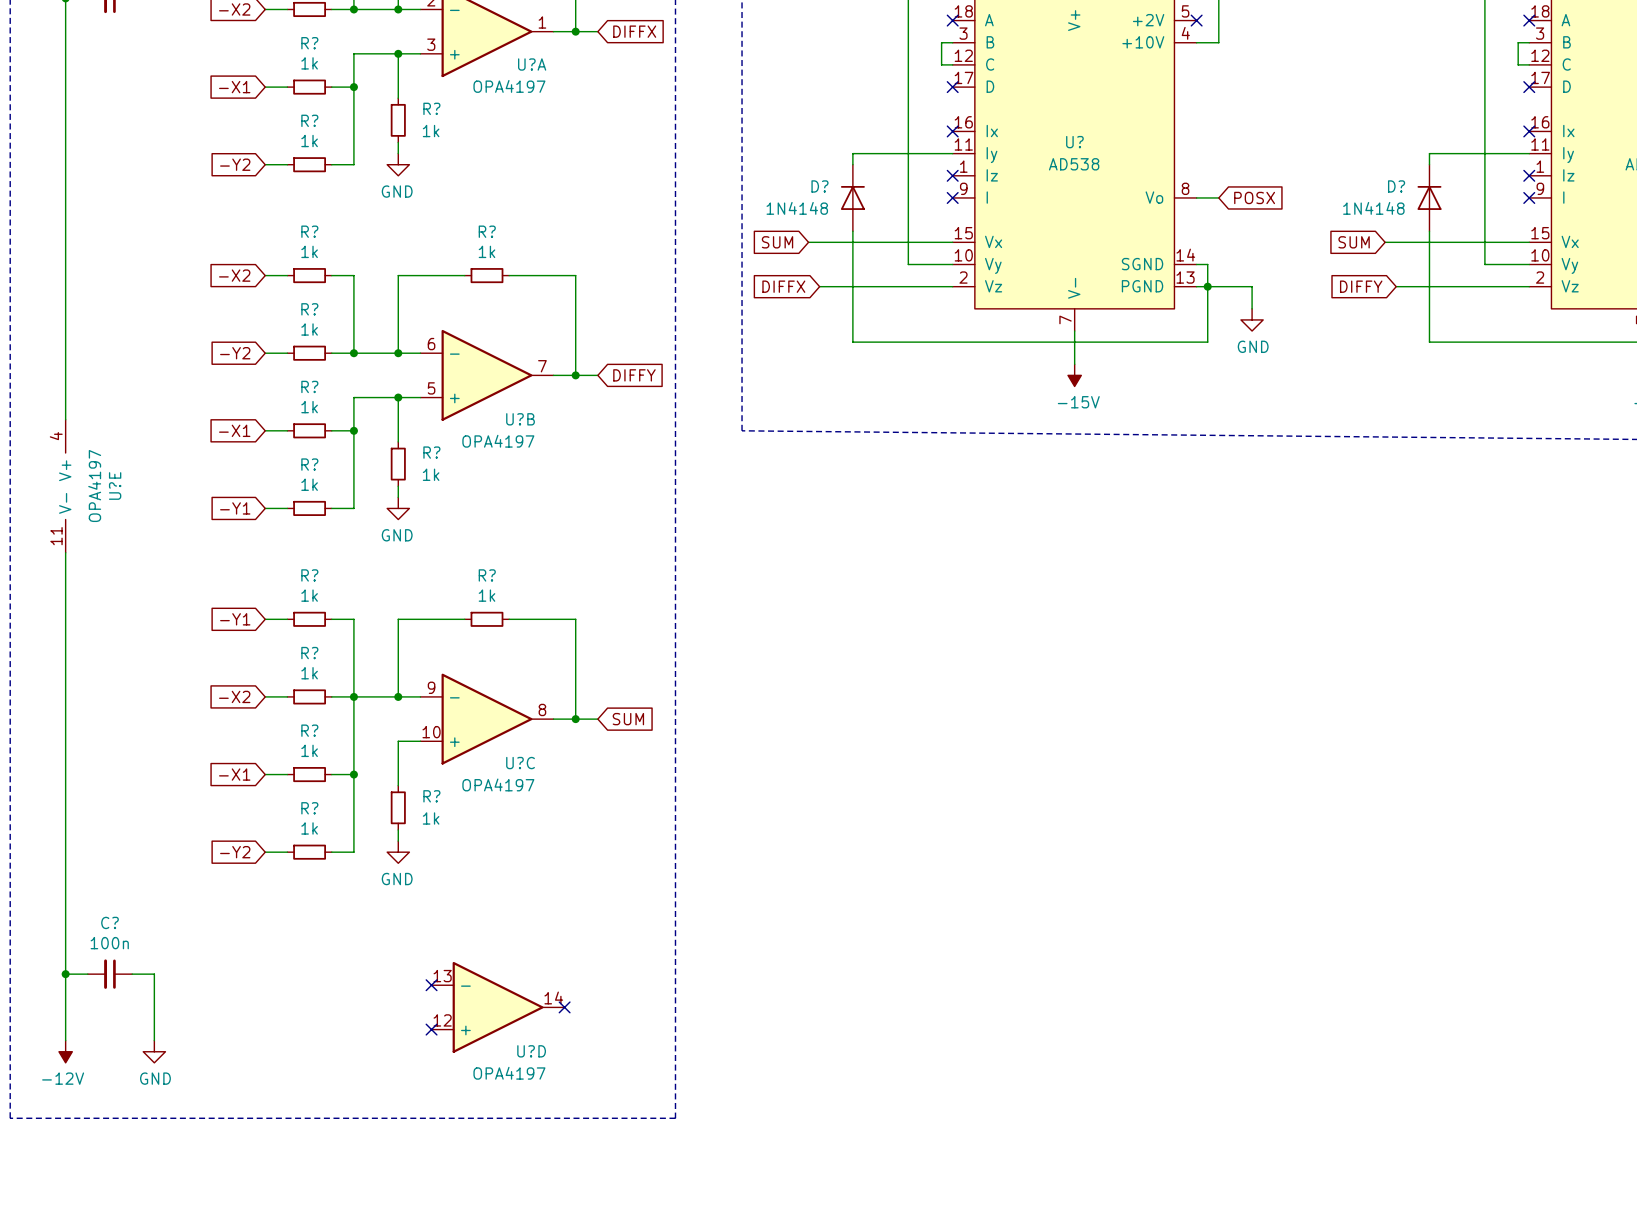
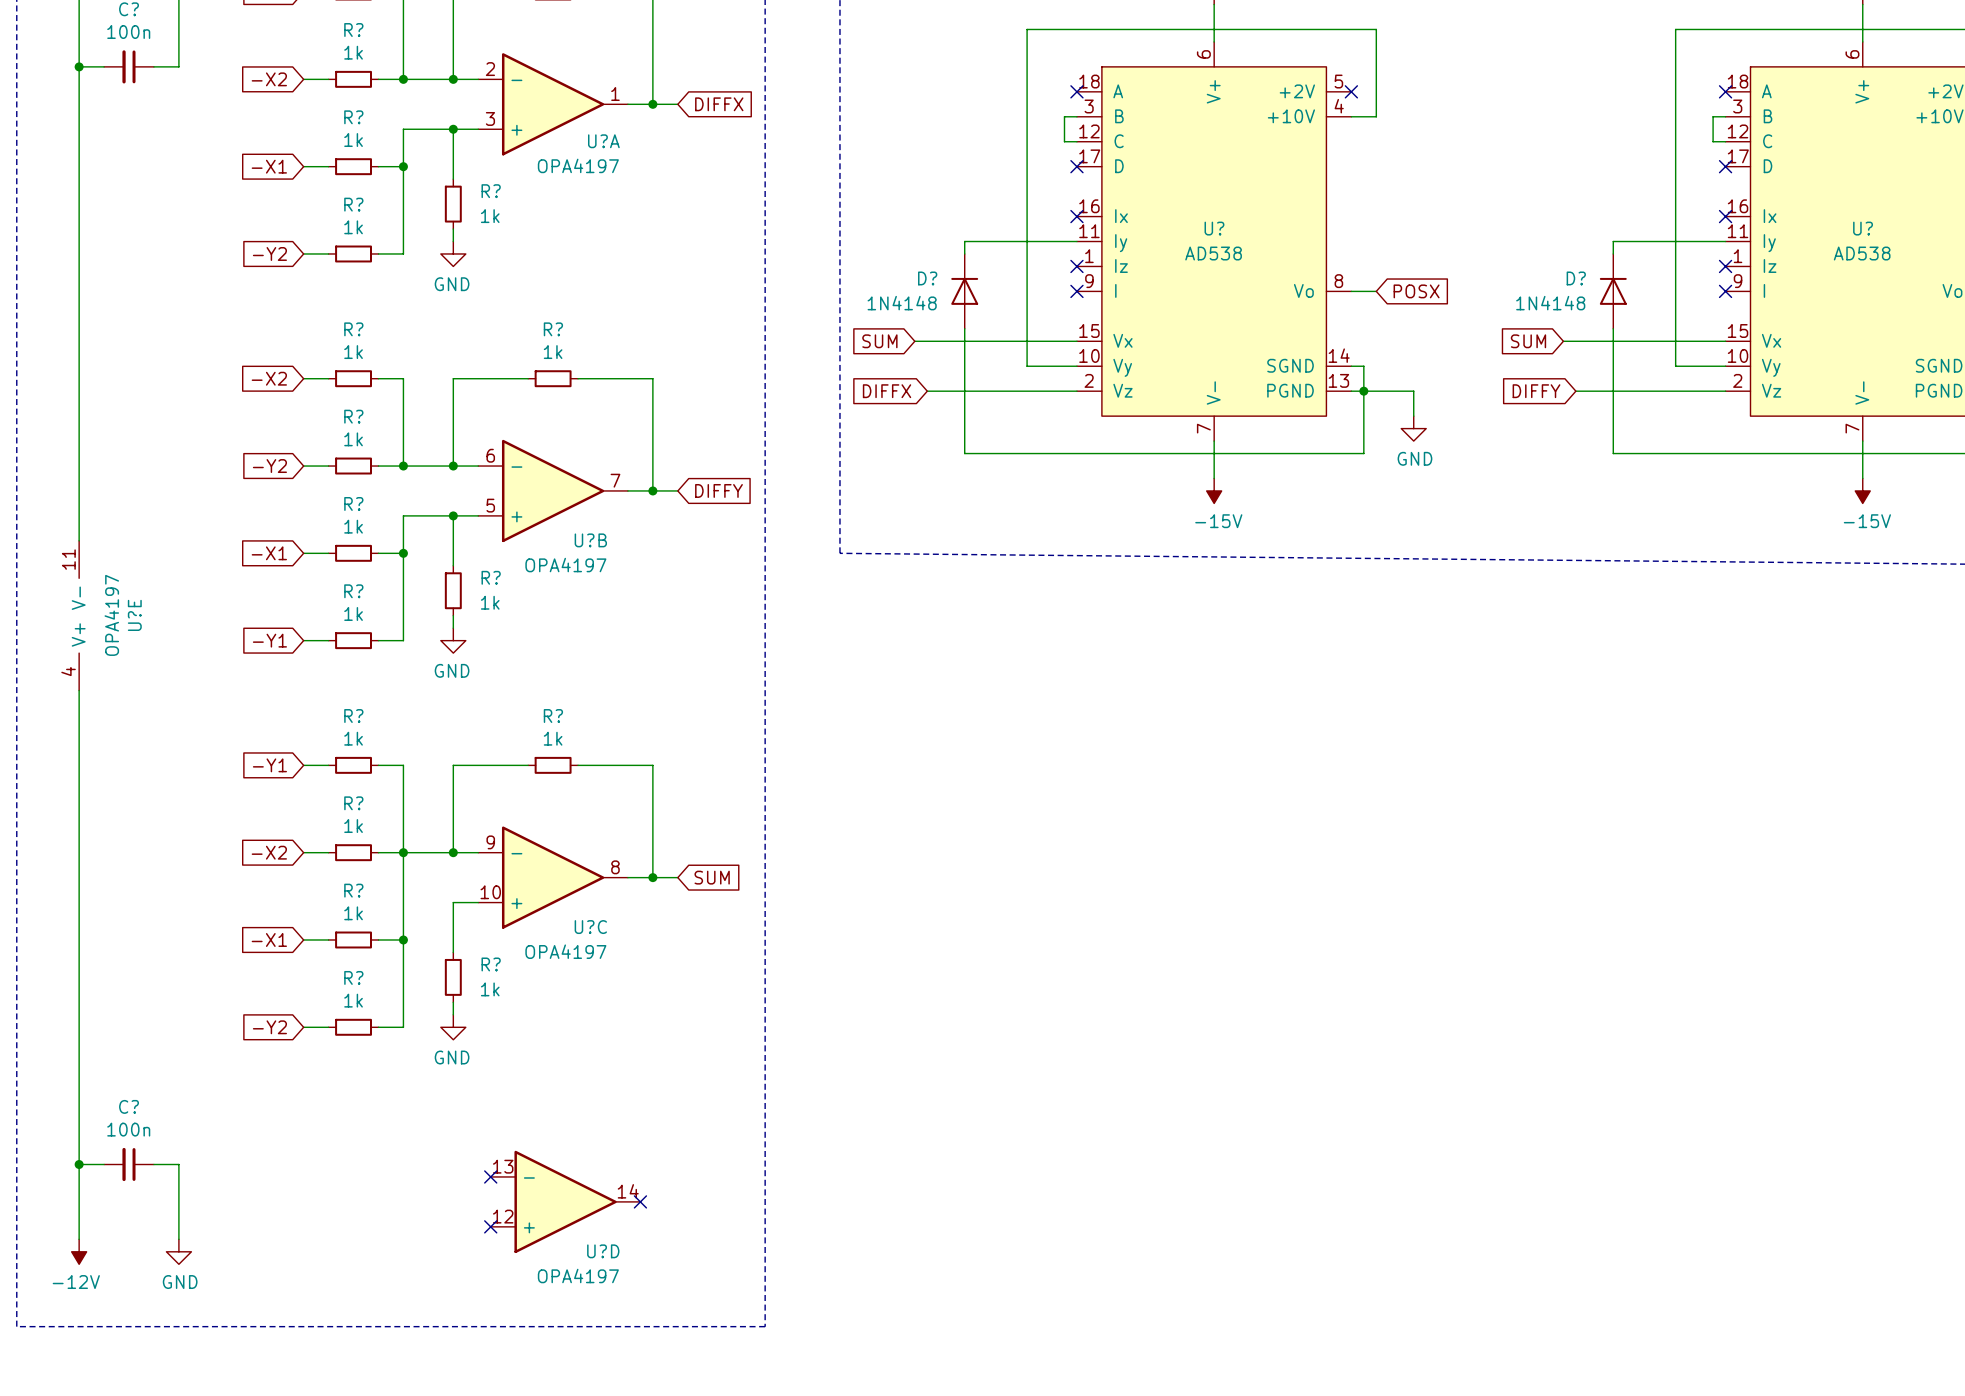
U?E rotation: 0° (65, 486) -> 180° (79, 615)

